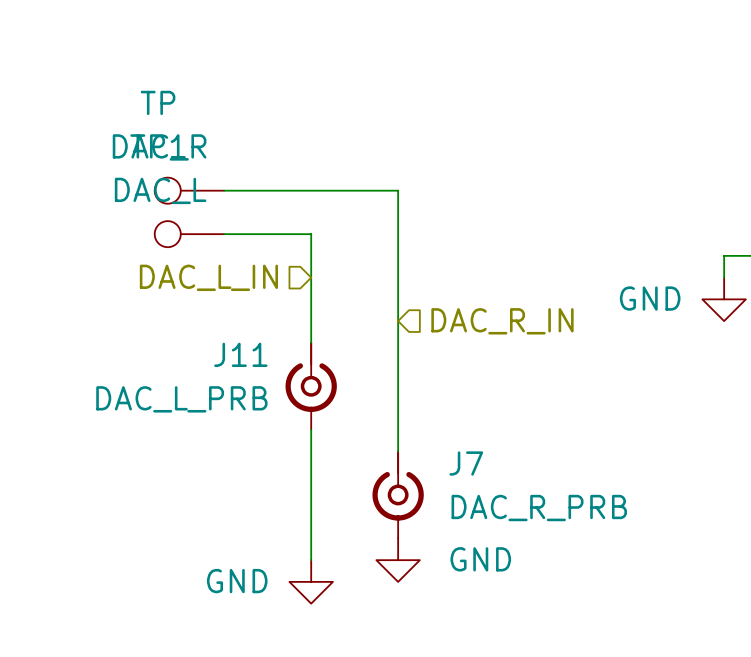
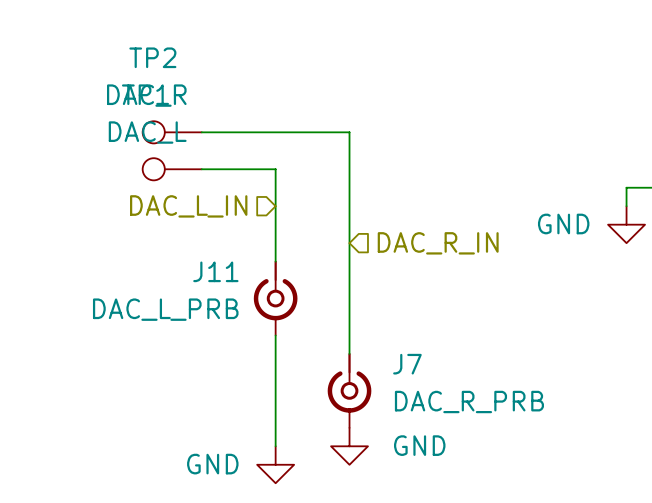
TP name: TP (158, 102) -> TP2 (152, 57)

